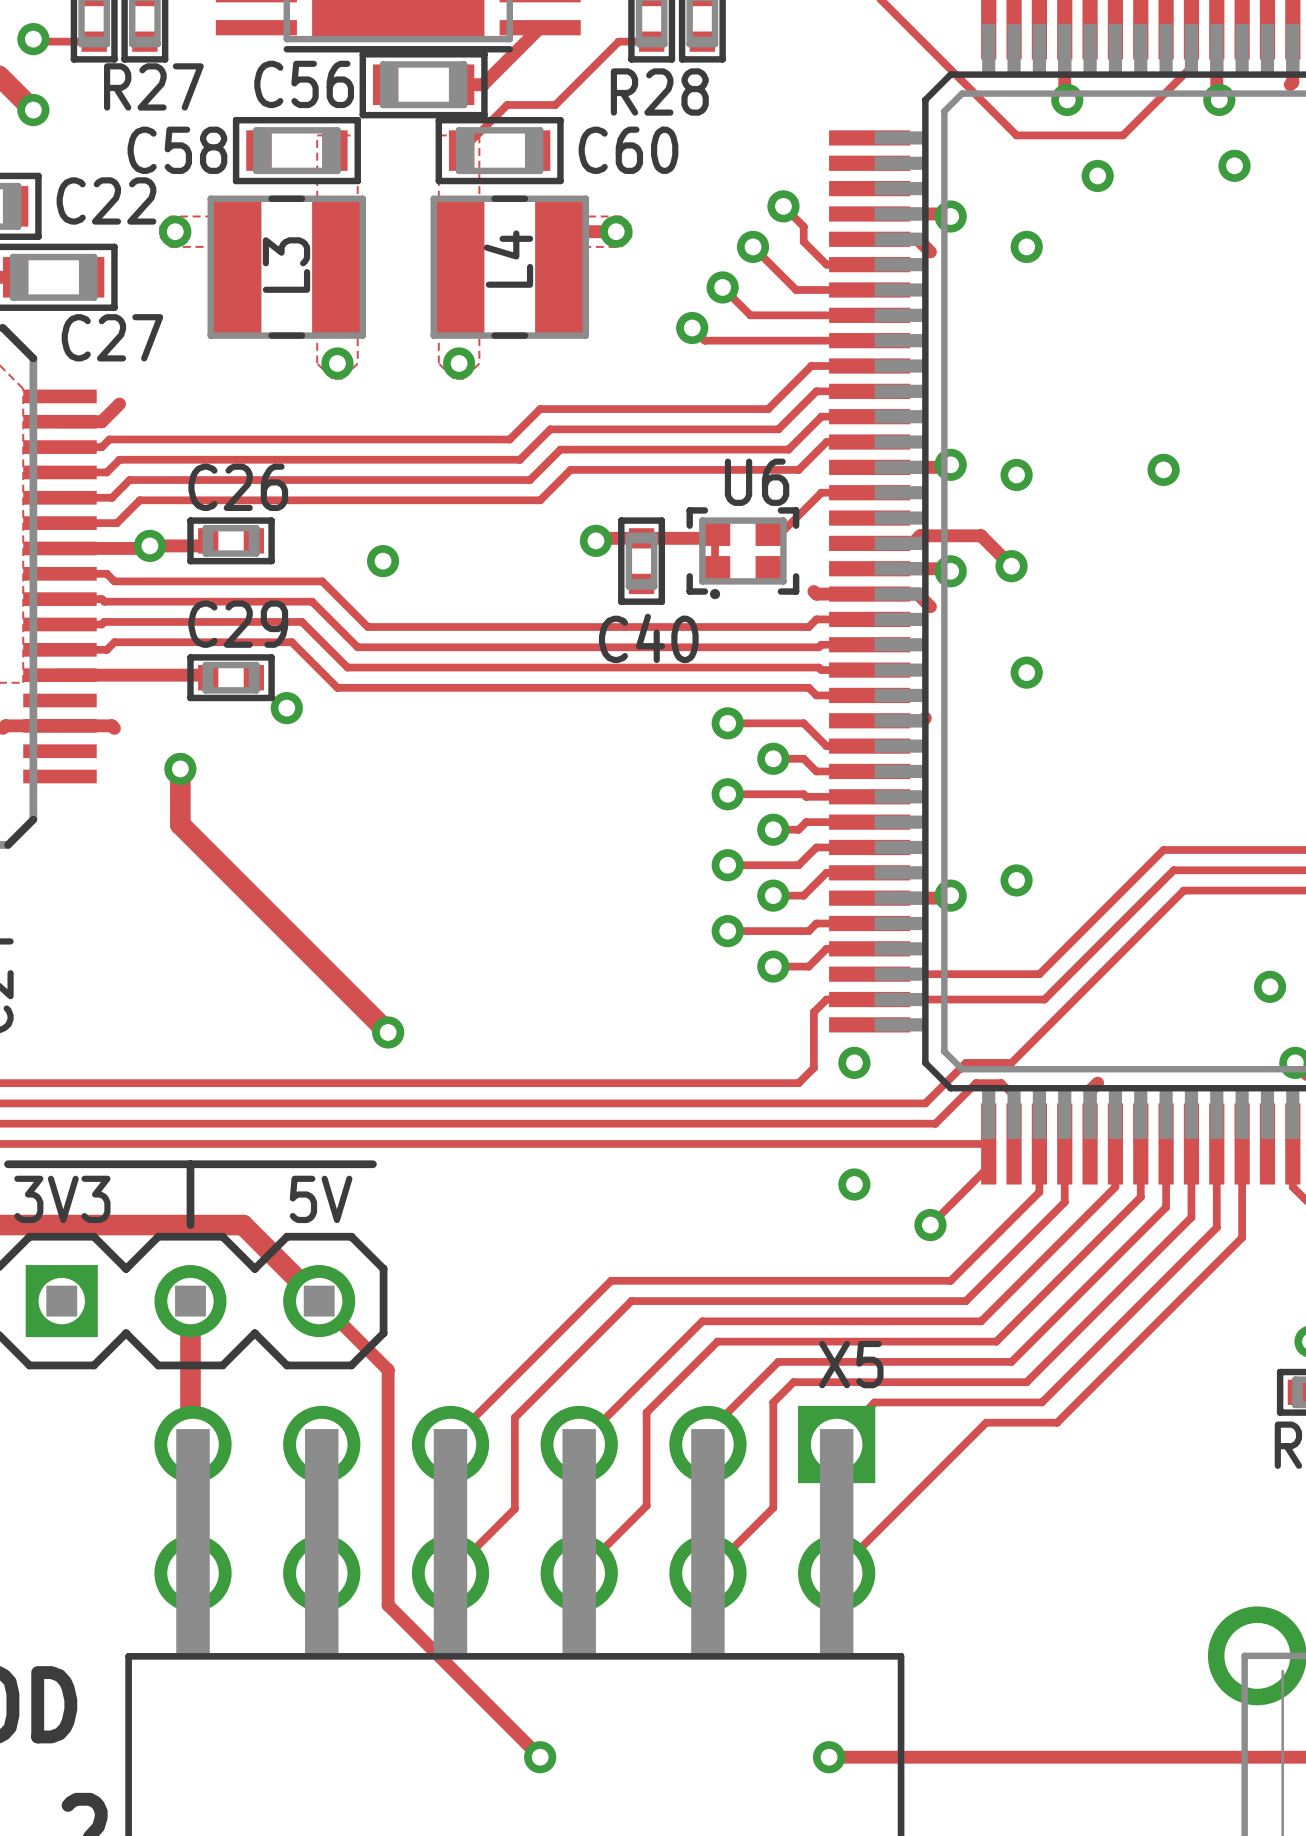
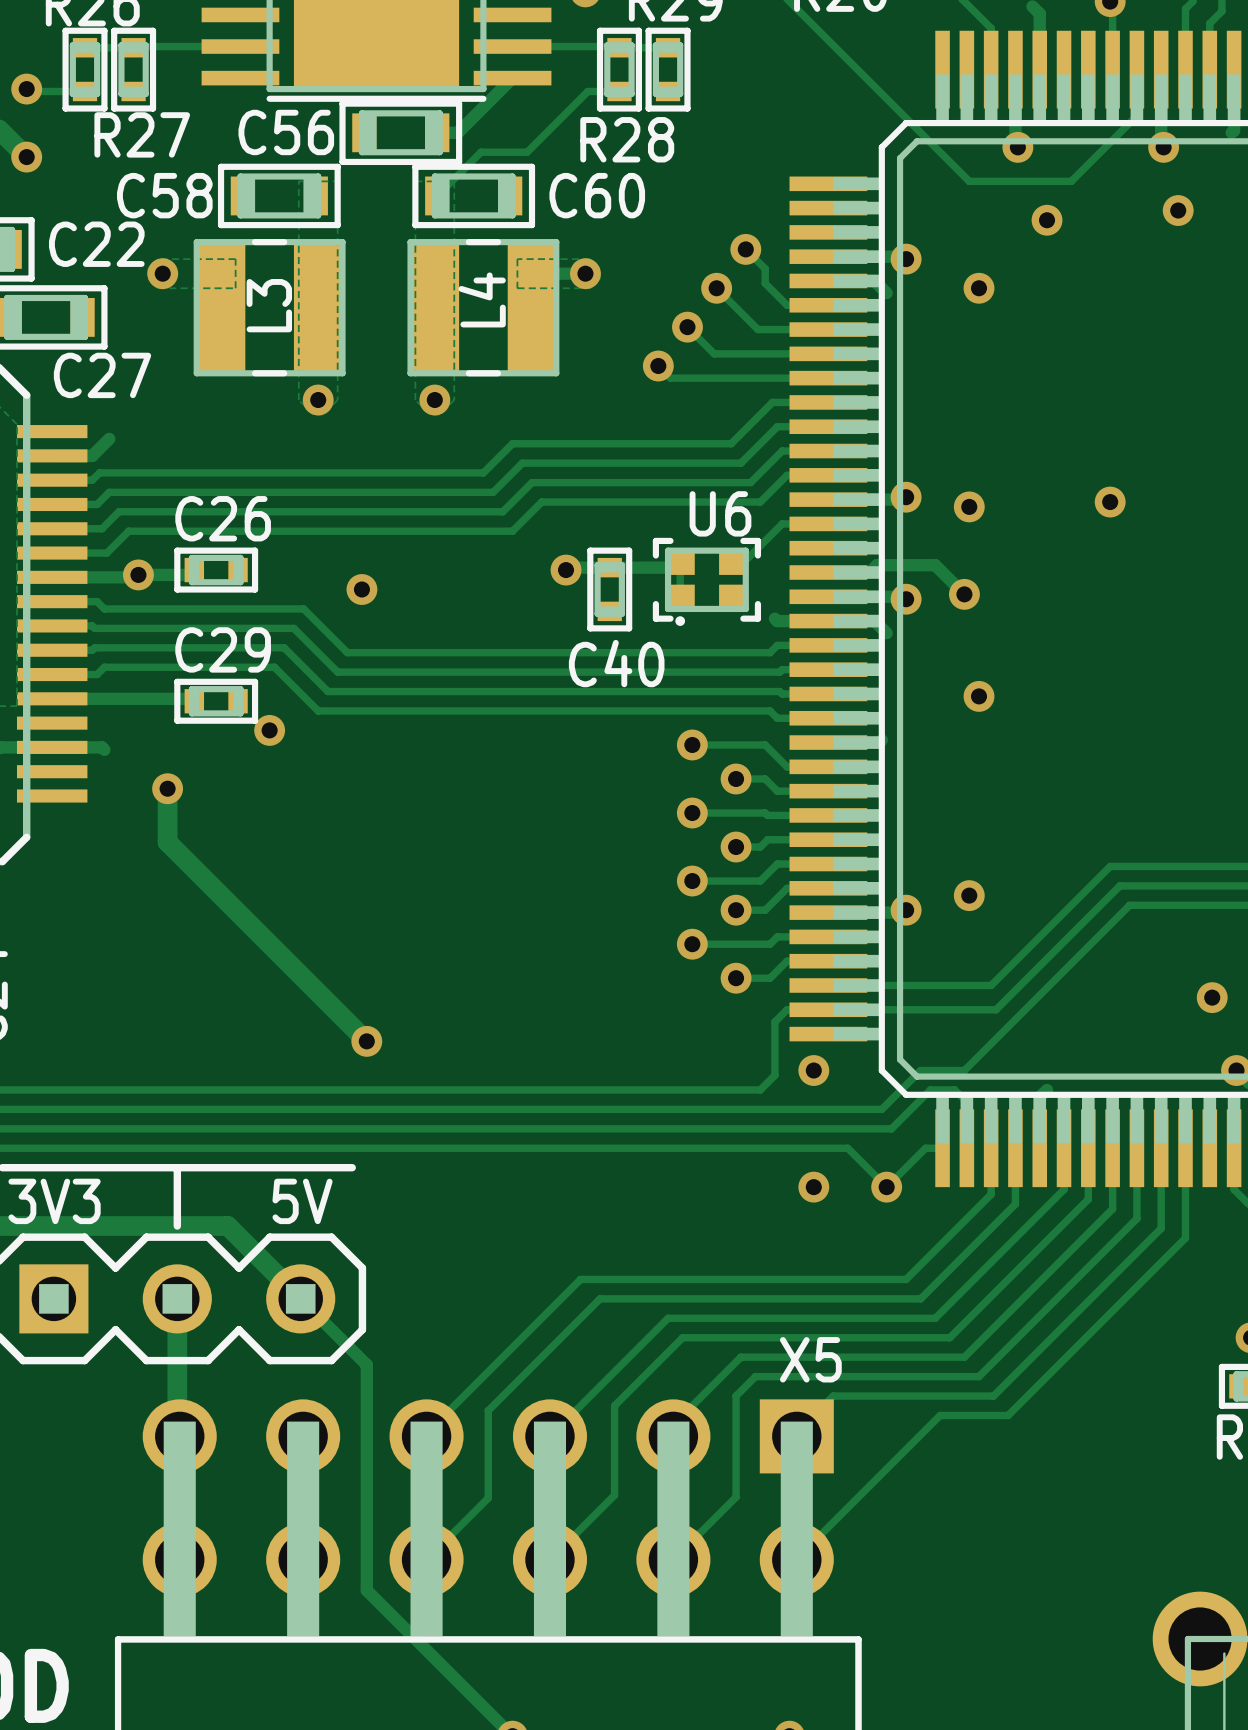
track: (889, 1143) (970, 1143) -> (847, 1148) (886, 1187) (925, 1148)
track: (988, 1143) (988, 1166) (930, 1225) -> none
via position: (930, 1225) -> (886, 1187)

